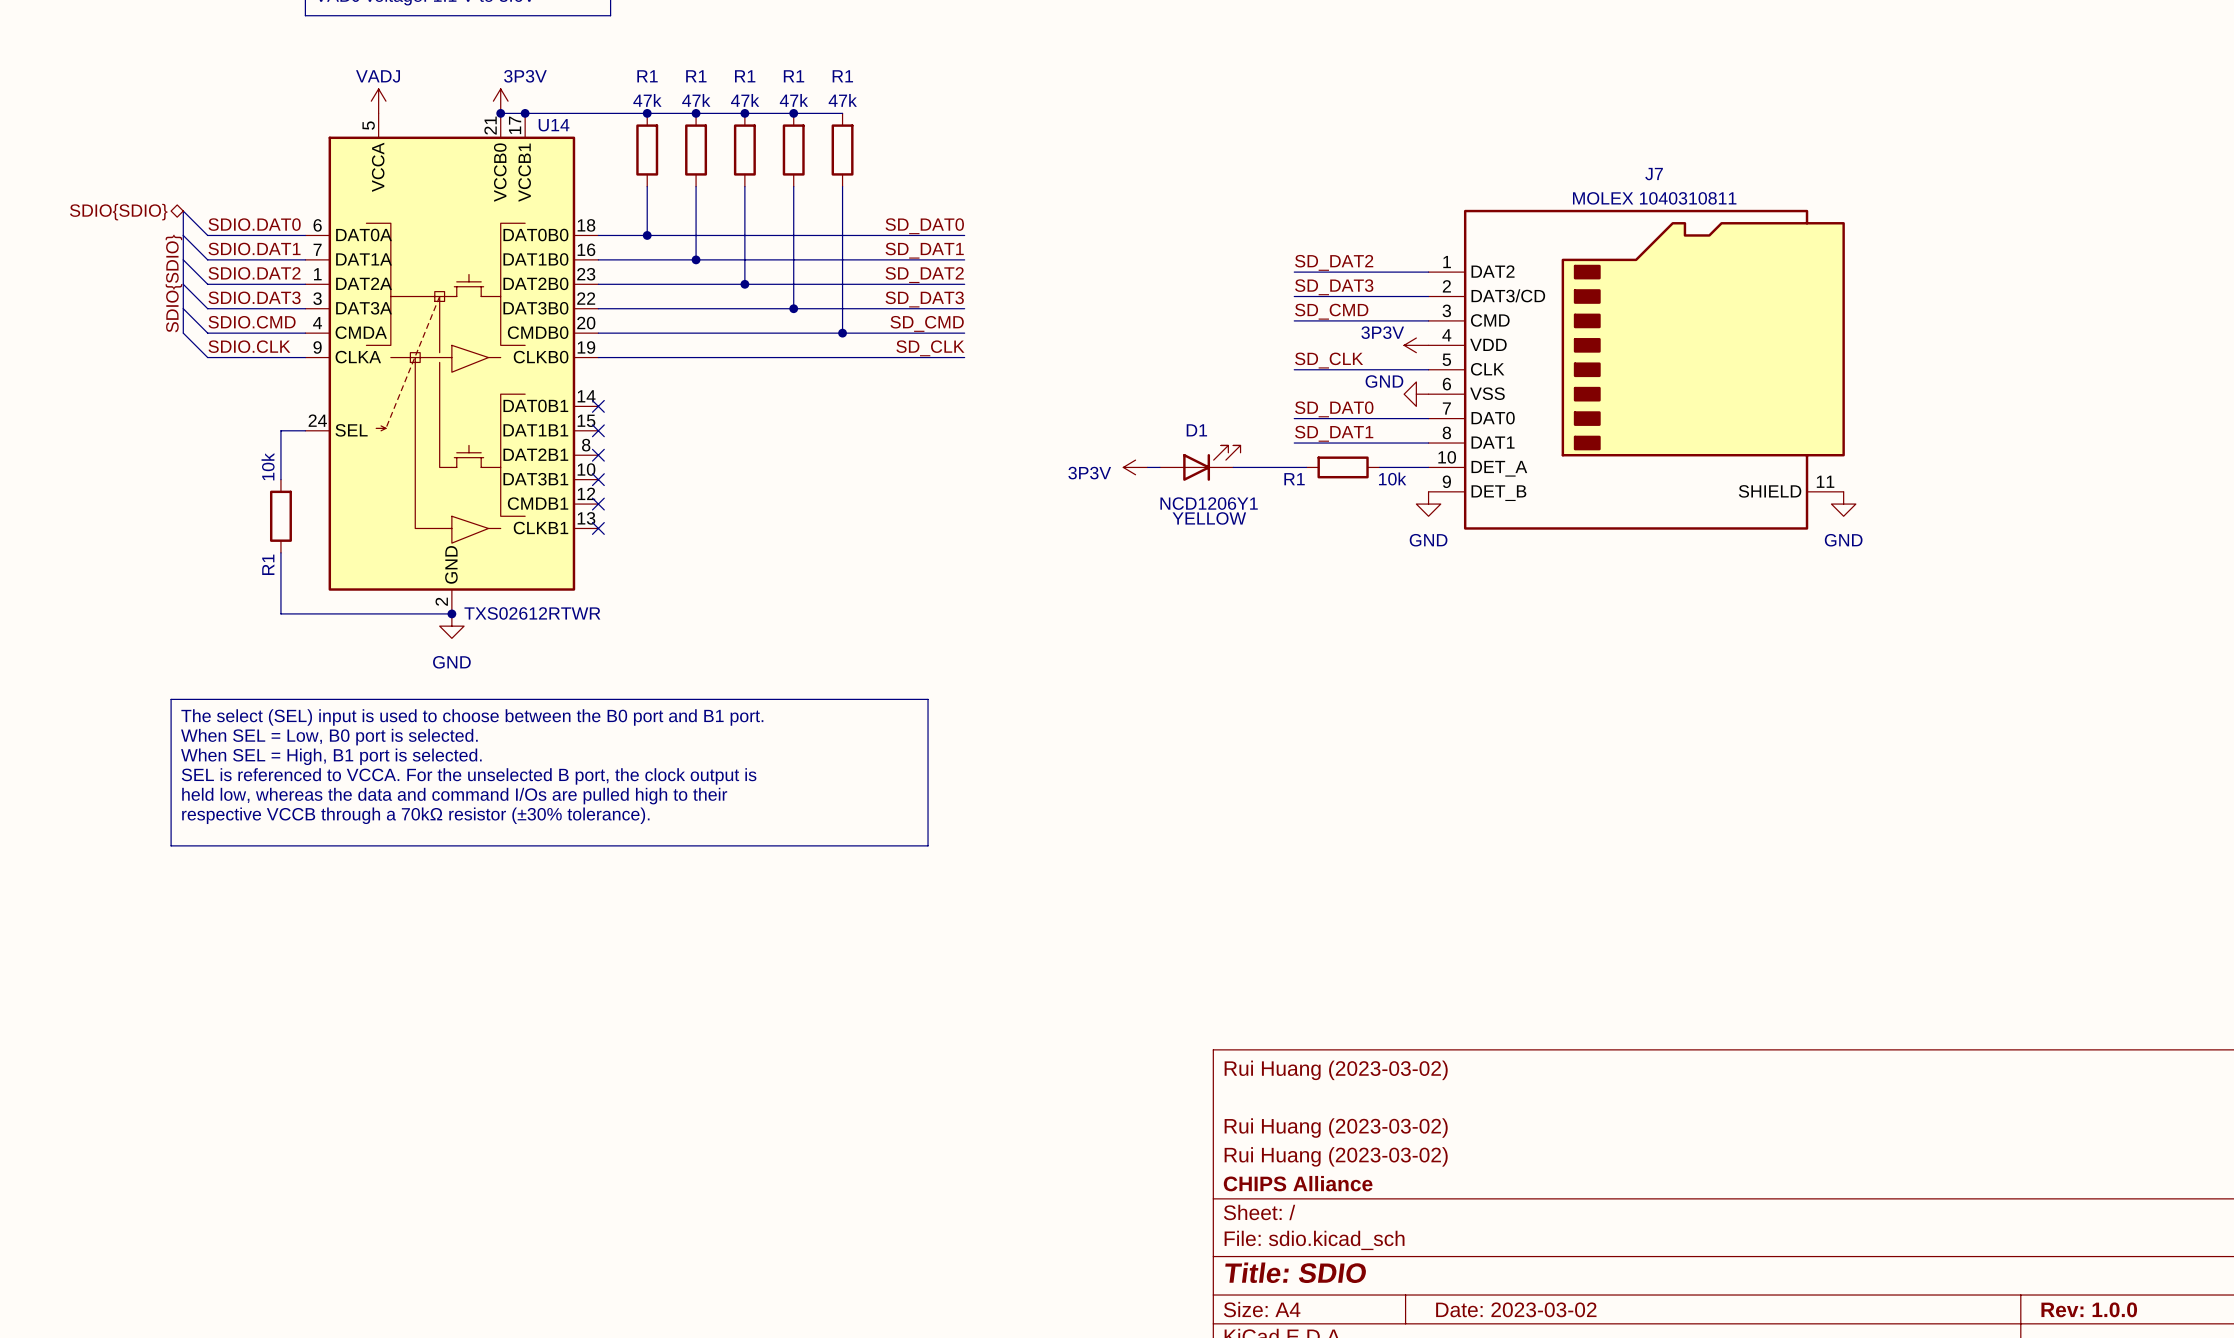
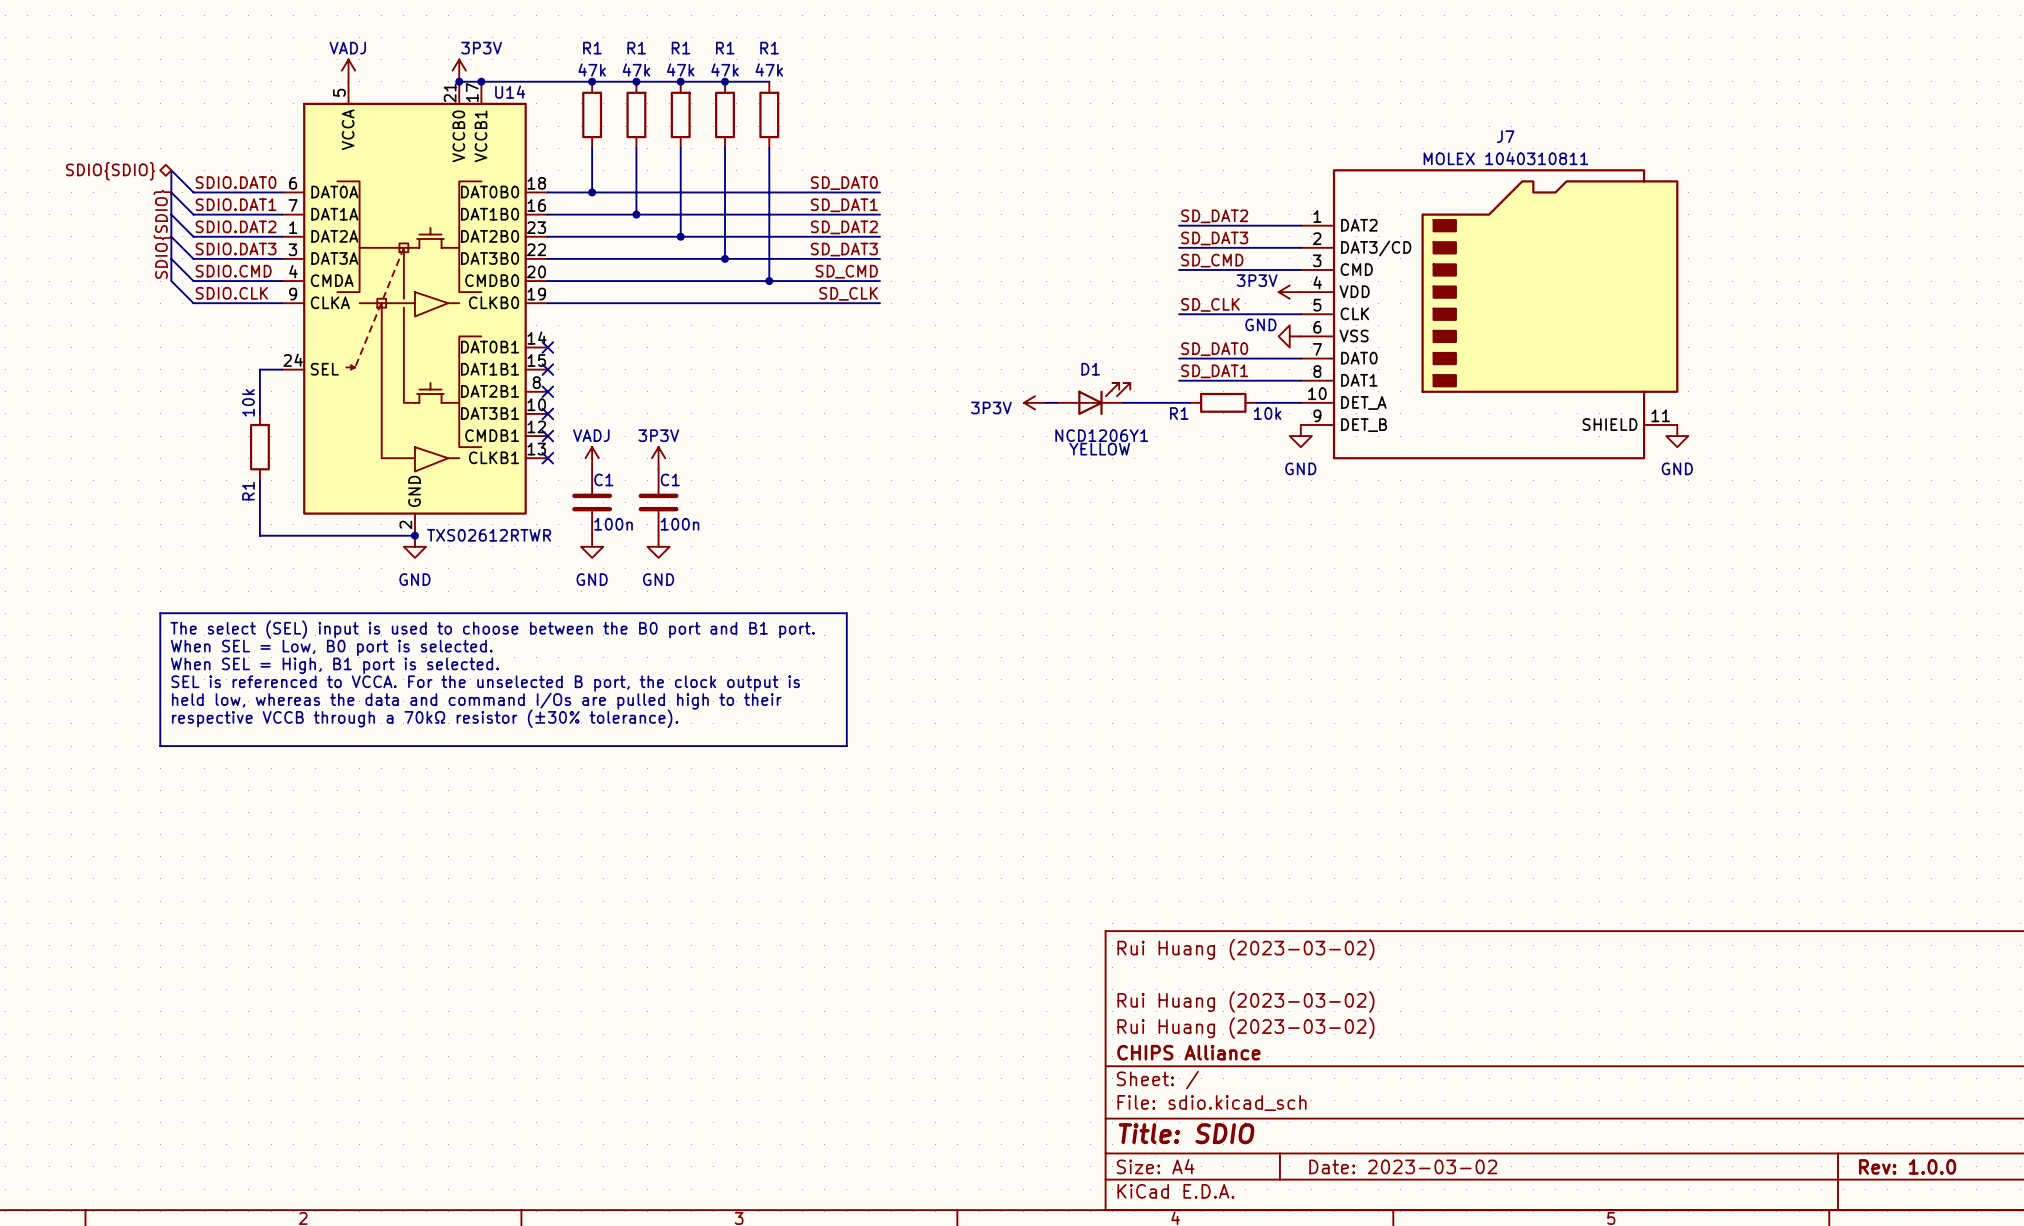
power symbol: none -> VADJ (592, 458)
power symbol: none -> 3P3V (658, 458)
C1: none -> 100n (592, 502)
C1: none -> 100n (658, 502)
power symbol: none -> GND (592, 546)
power symbol: none -> GND (658, 546)

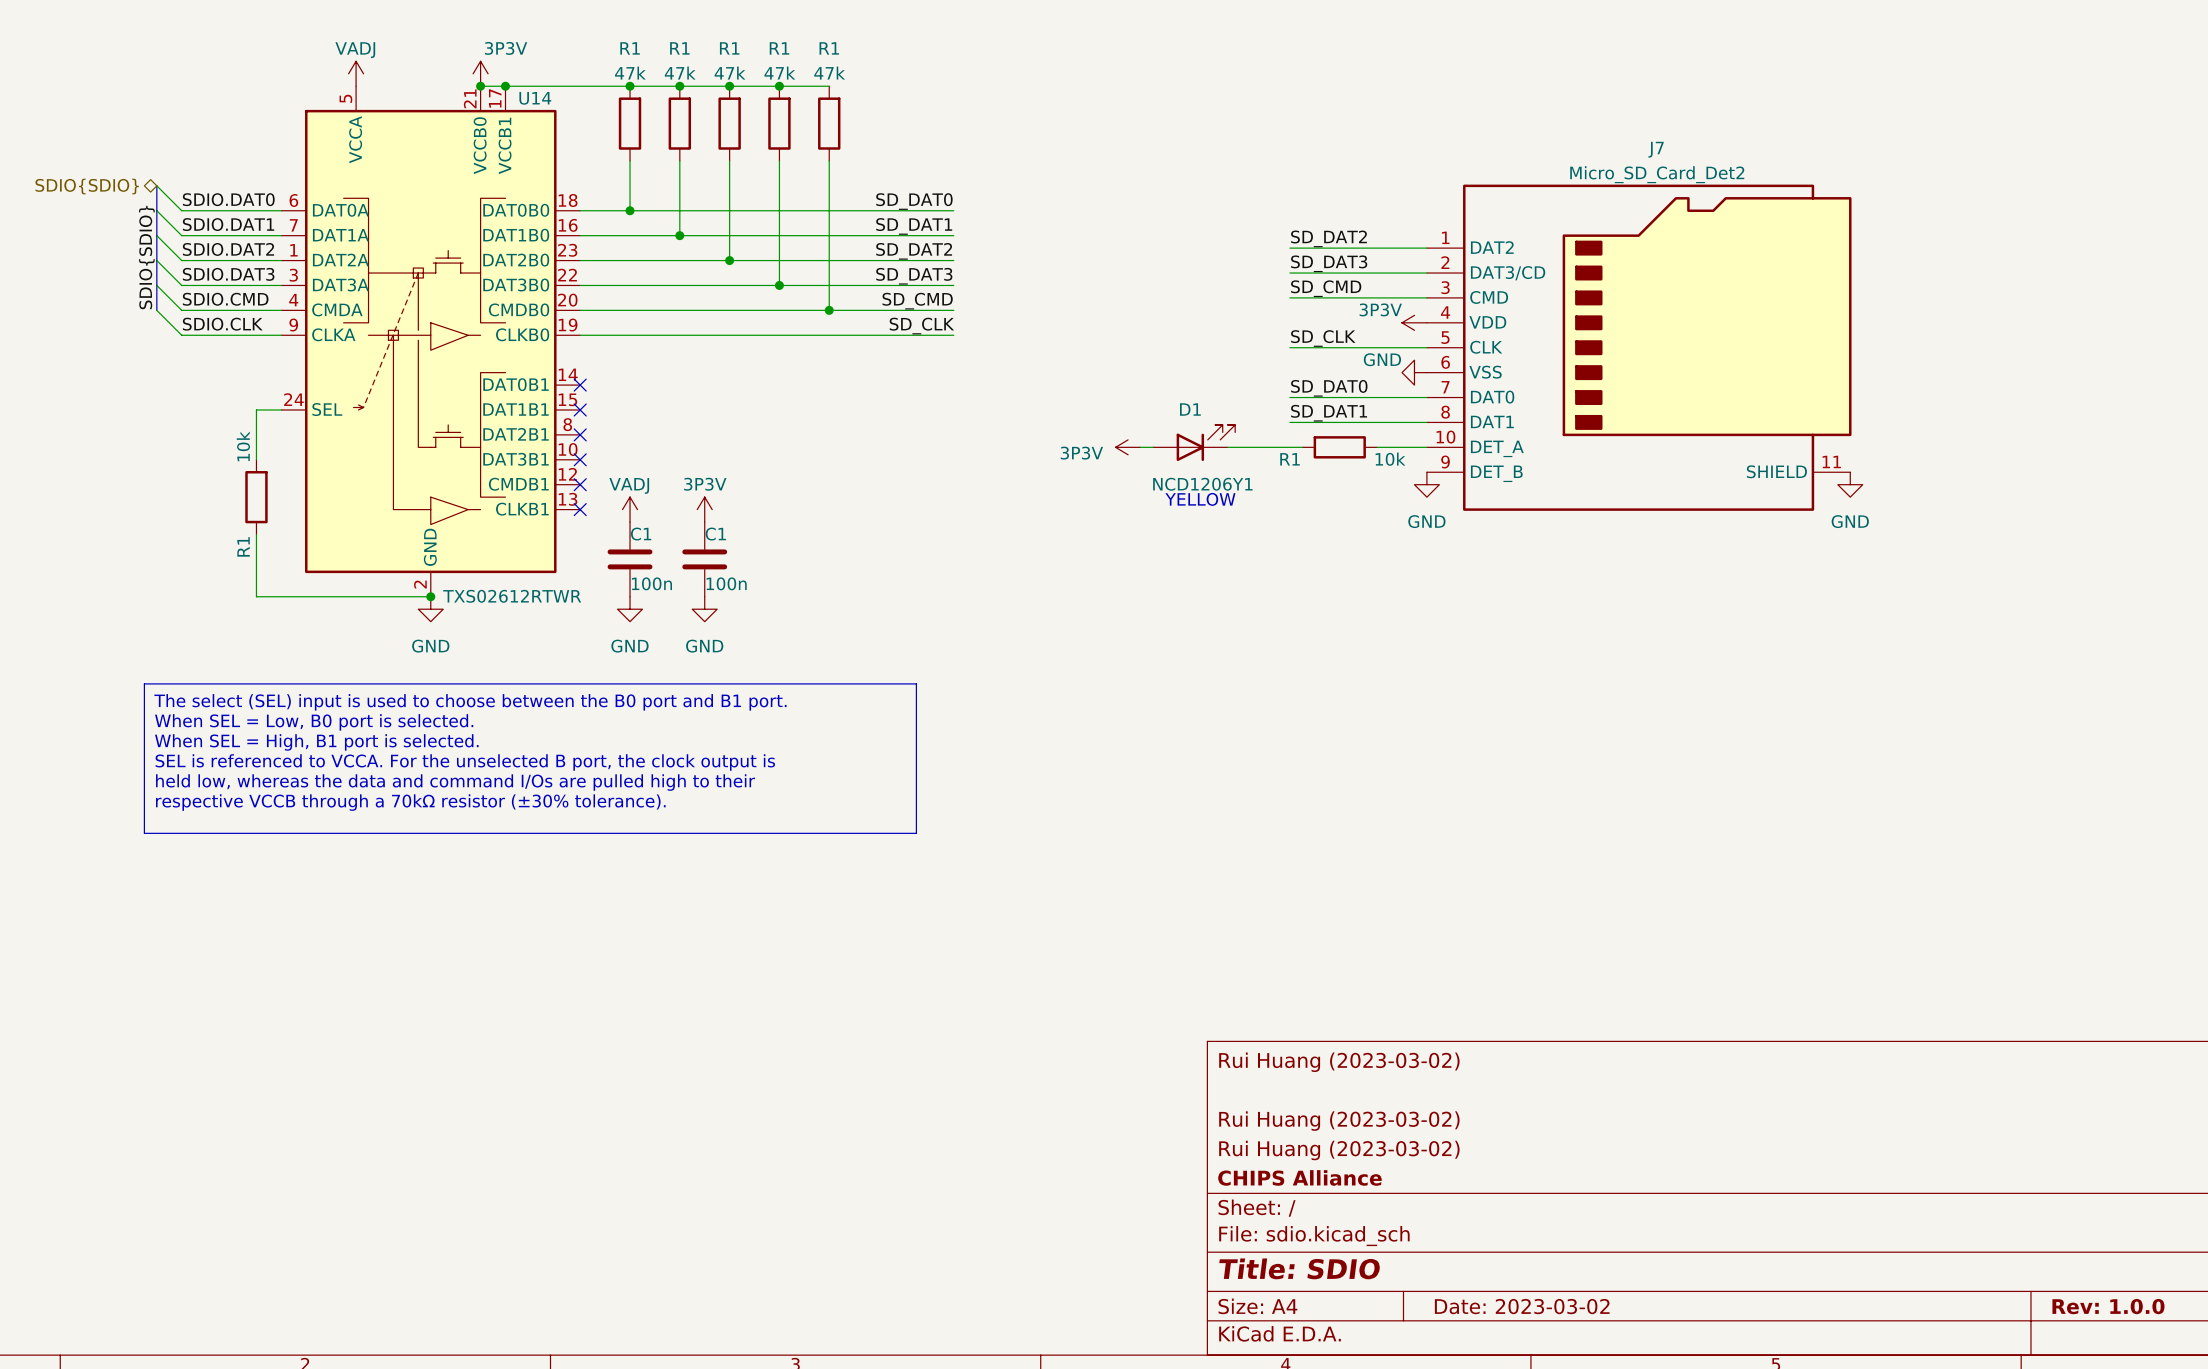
J7 value: MOLEX 1040310811 (1505, 158) -> Micro_SD_Card_Det2 (1657, 174)

